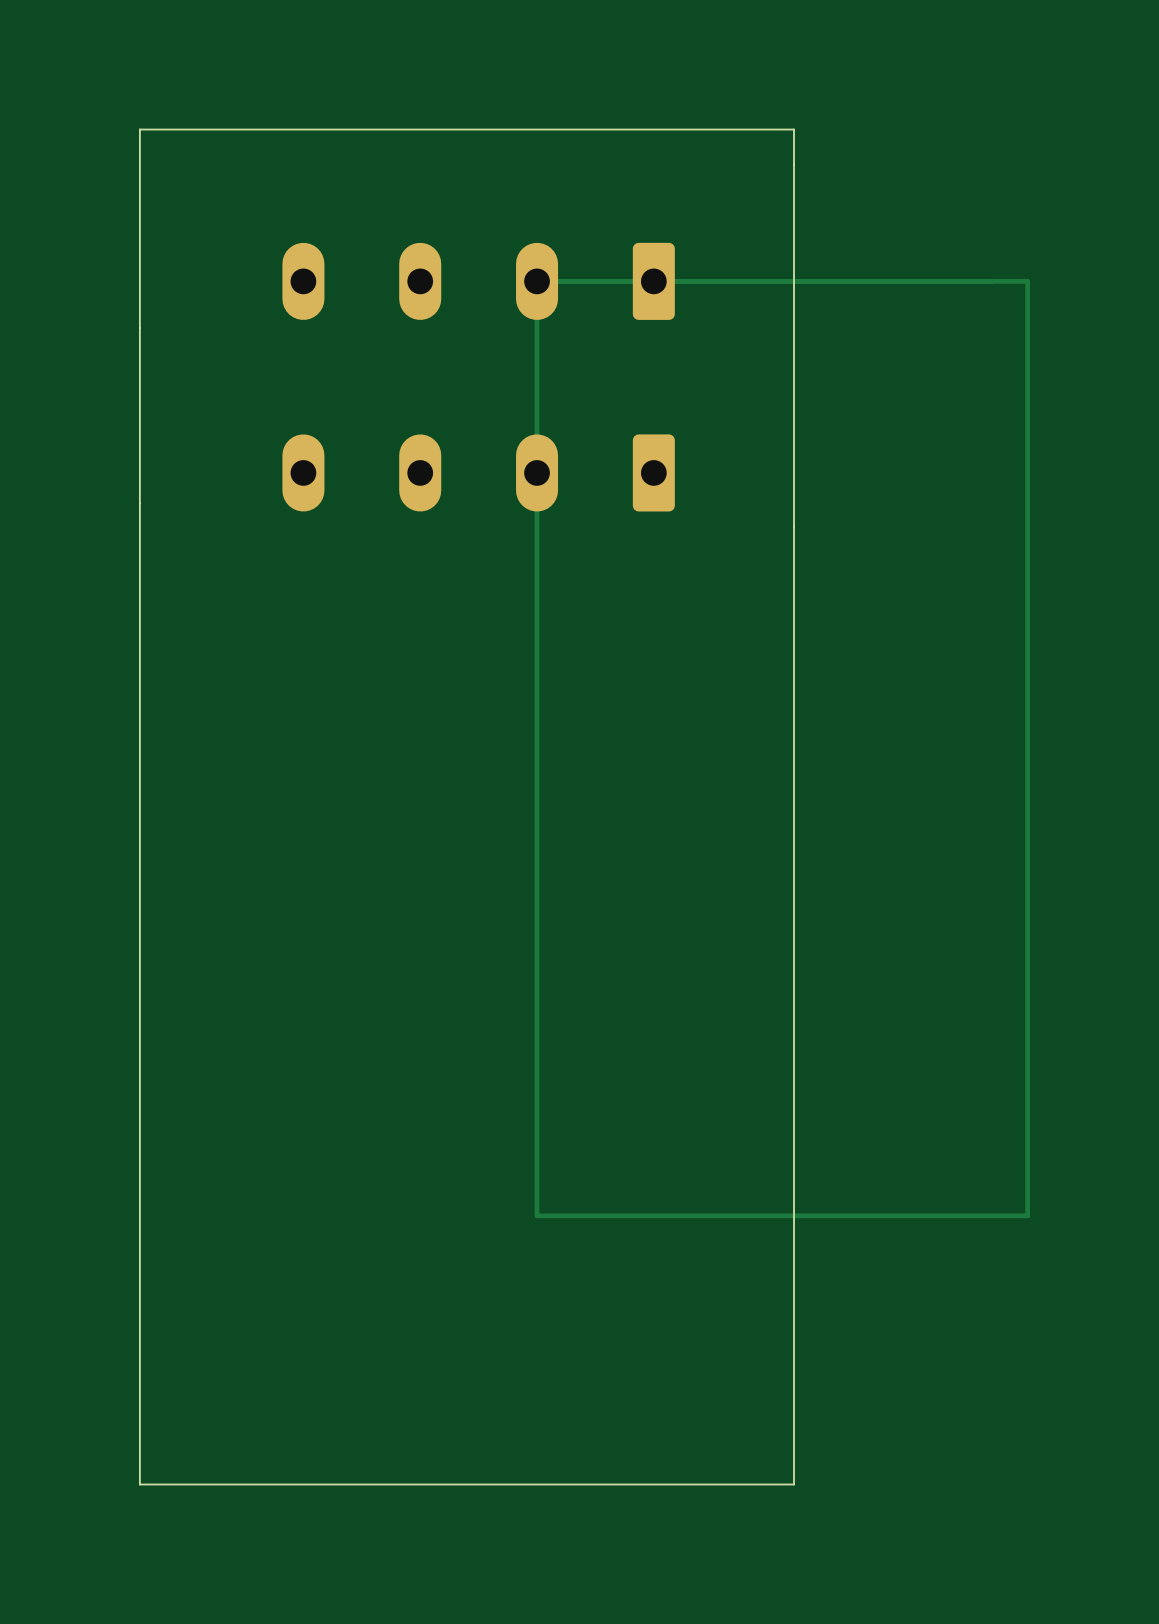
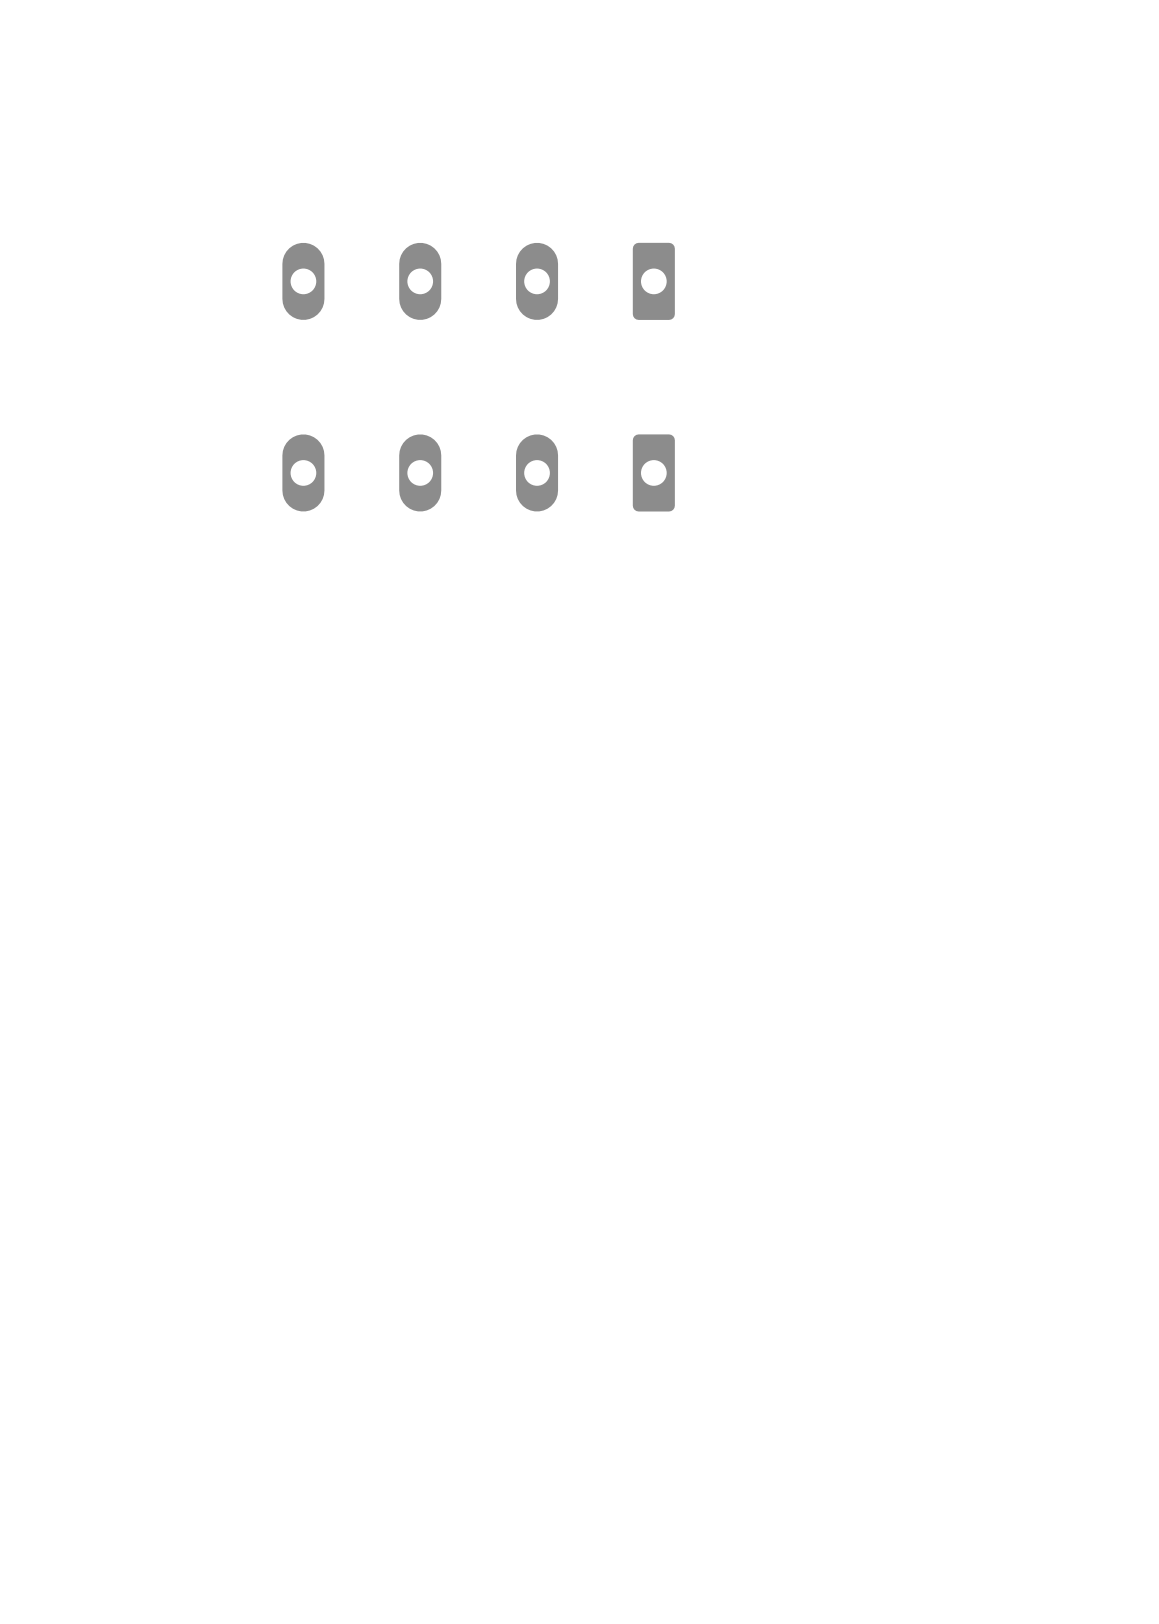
board edge: (794, 129) (794, 1484) (139, 1484) (139, 129) (794, 129) -> none
track: (1027, 281) (537, 281) (537, 1215) (1027, 1215) (1027, 281) -> none

